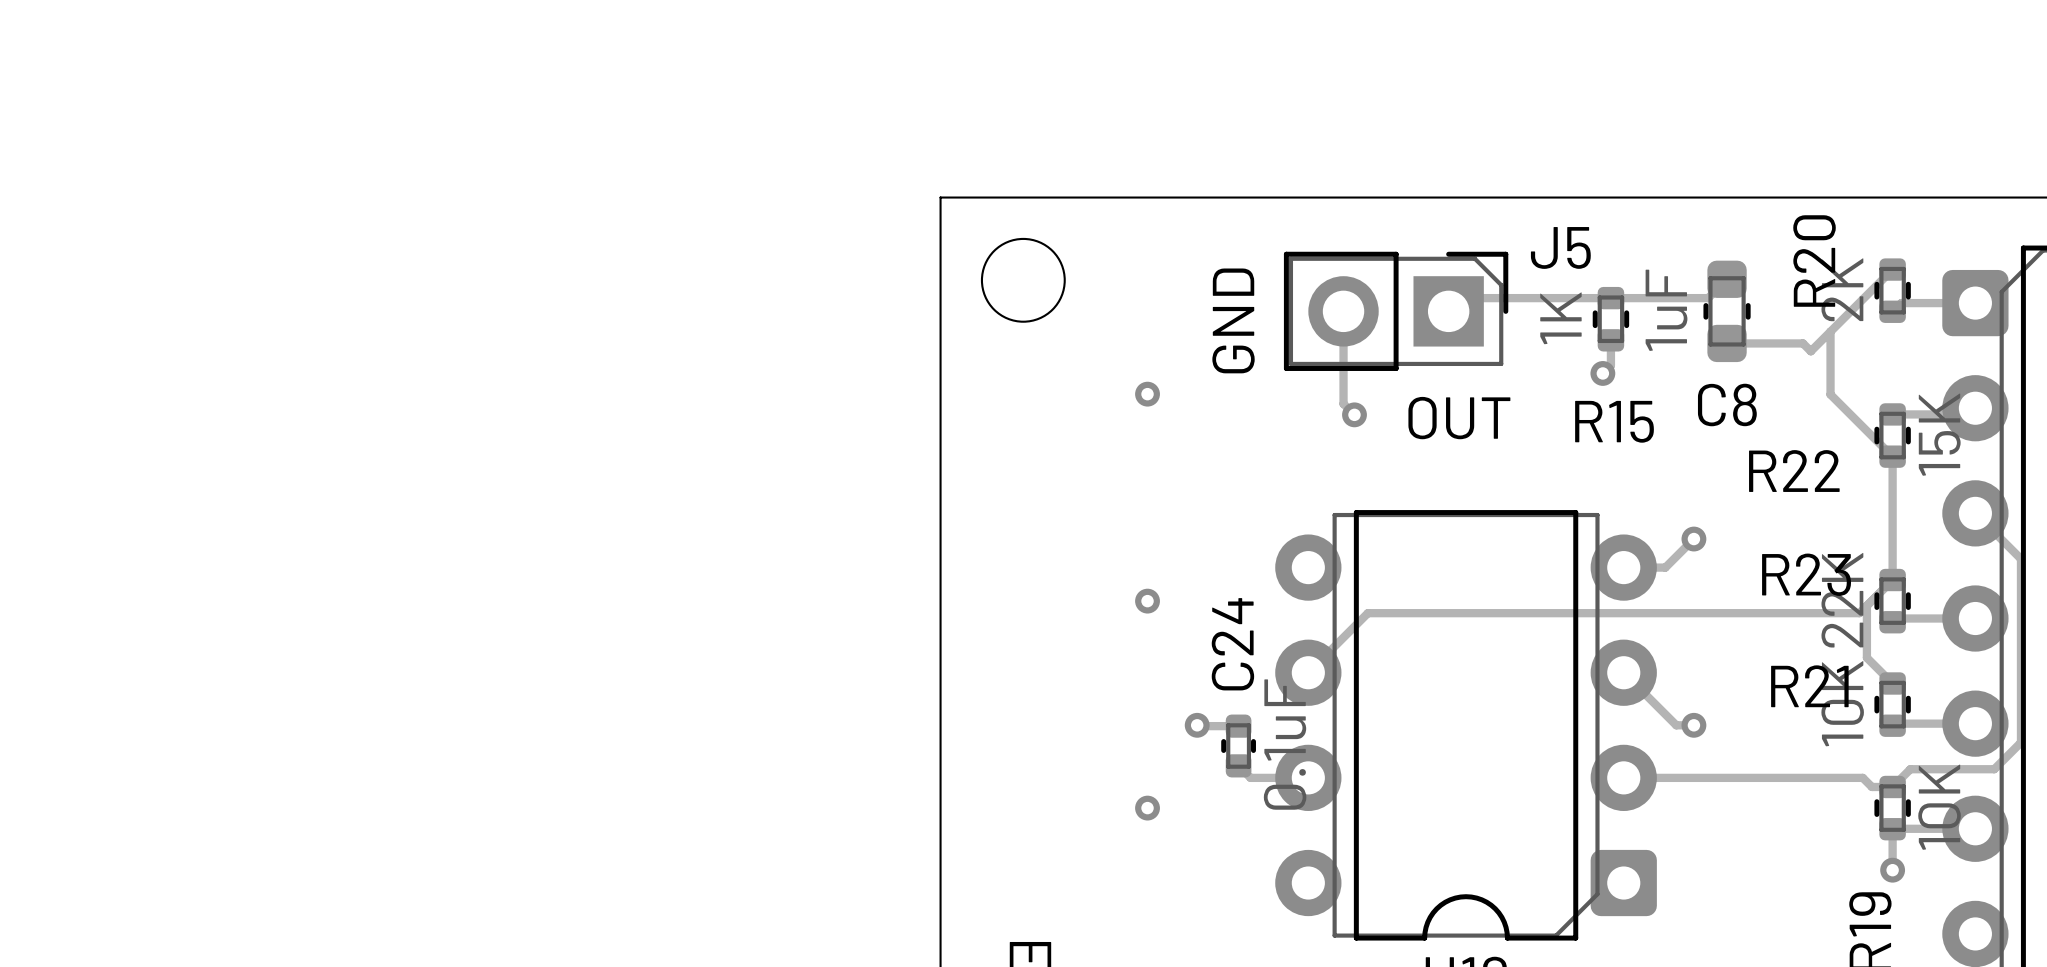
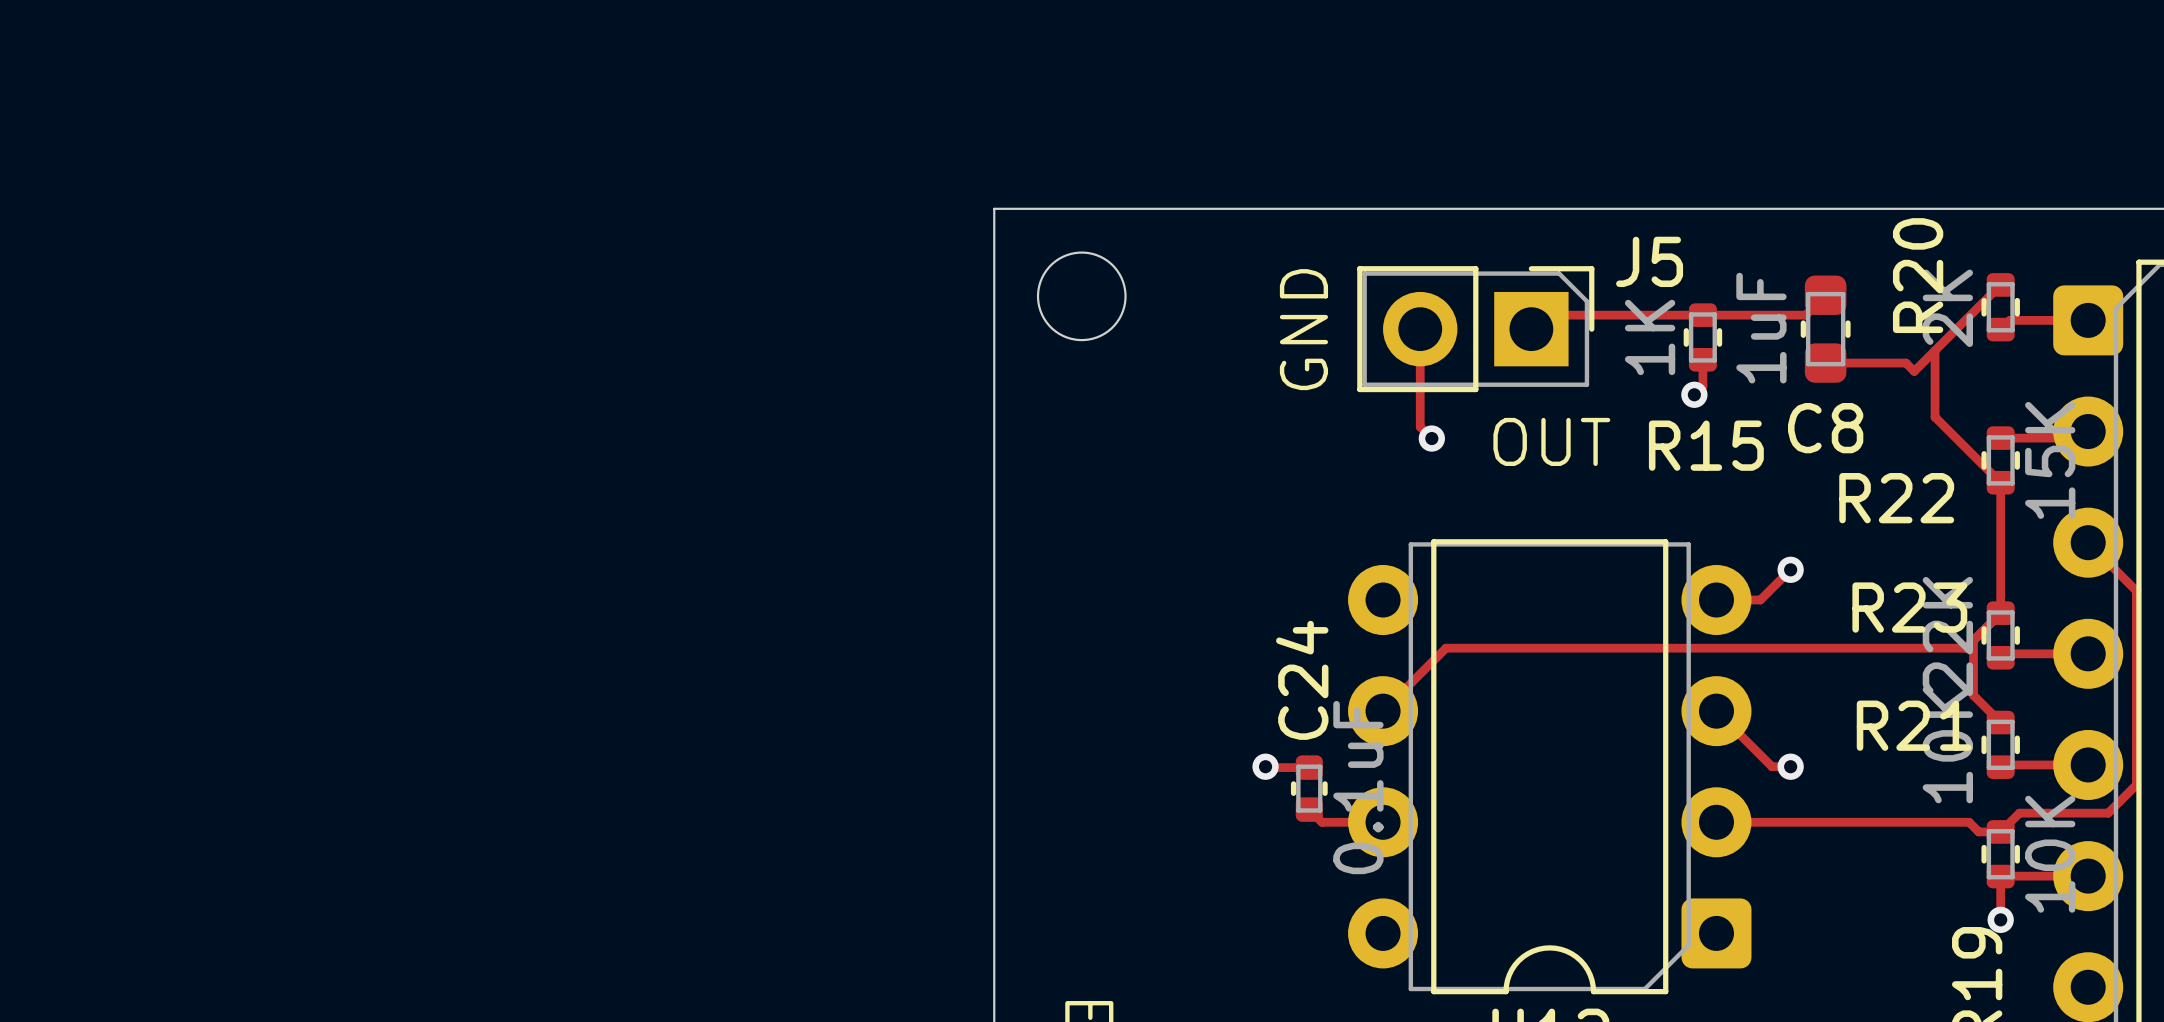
via: (1147, 394) -> none
via: (1147, 601) -> none
via: (1147, 808) -> none

